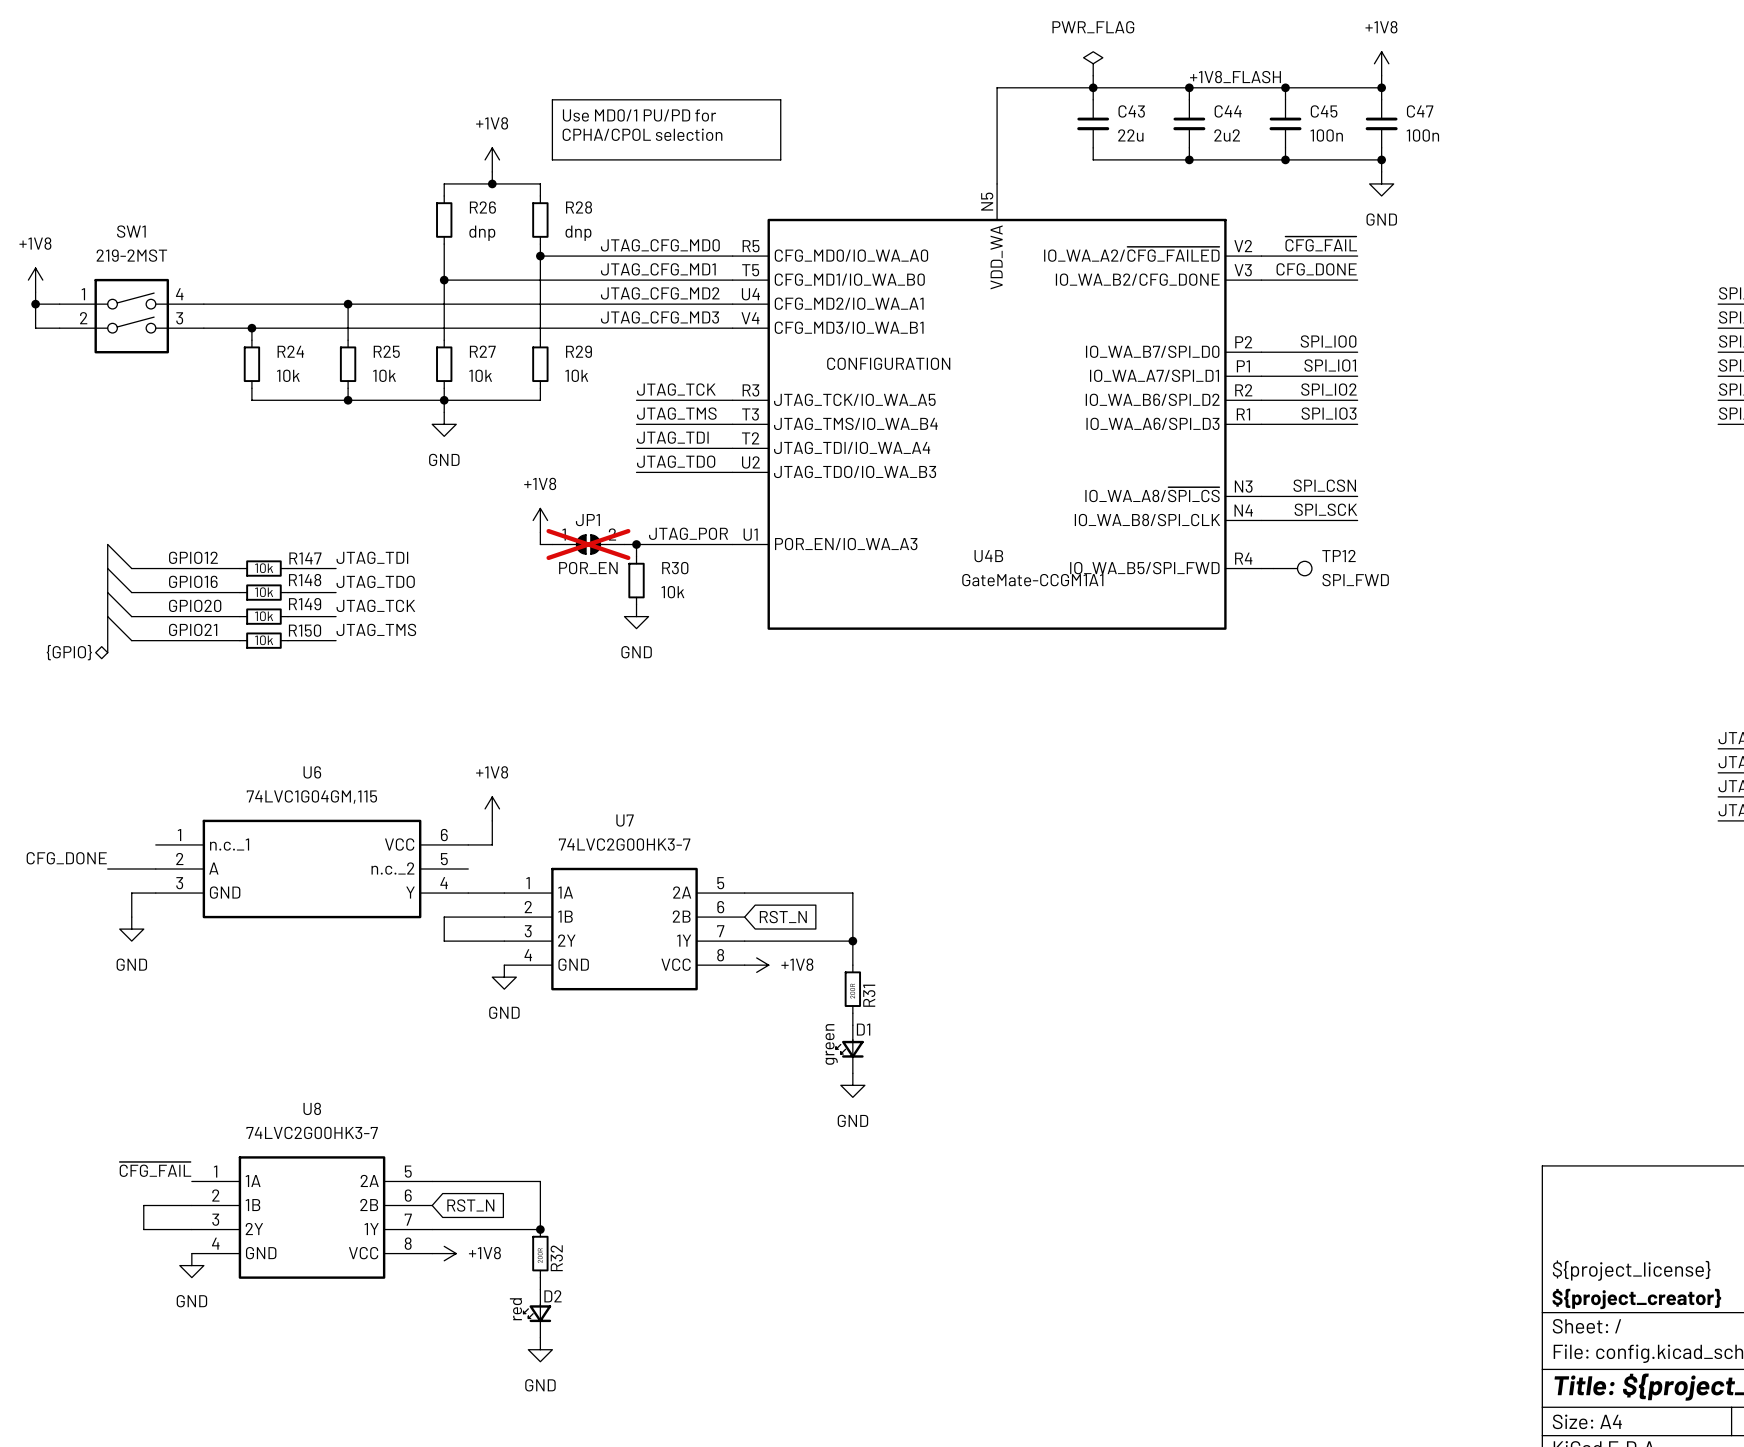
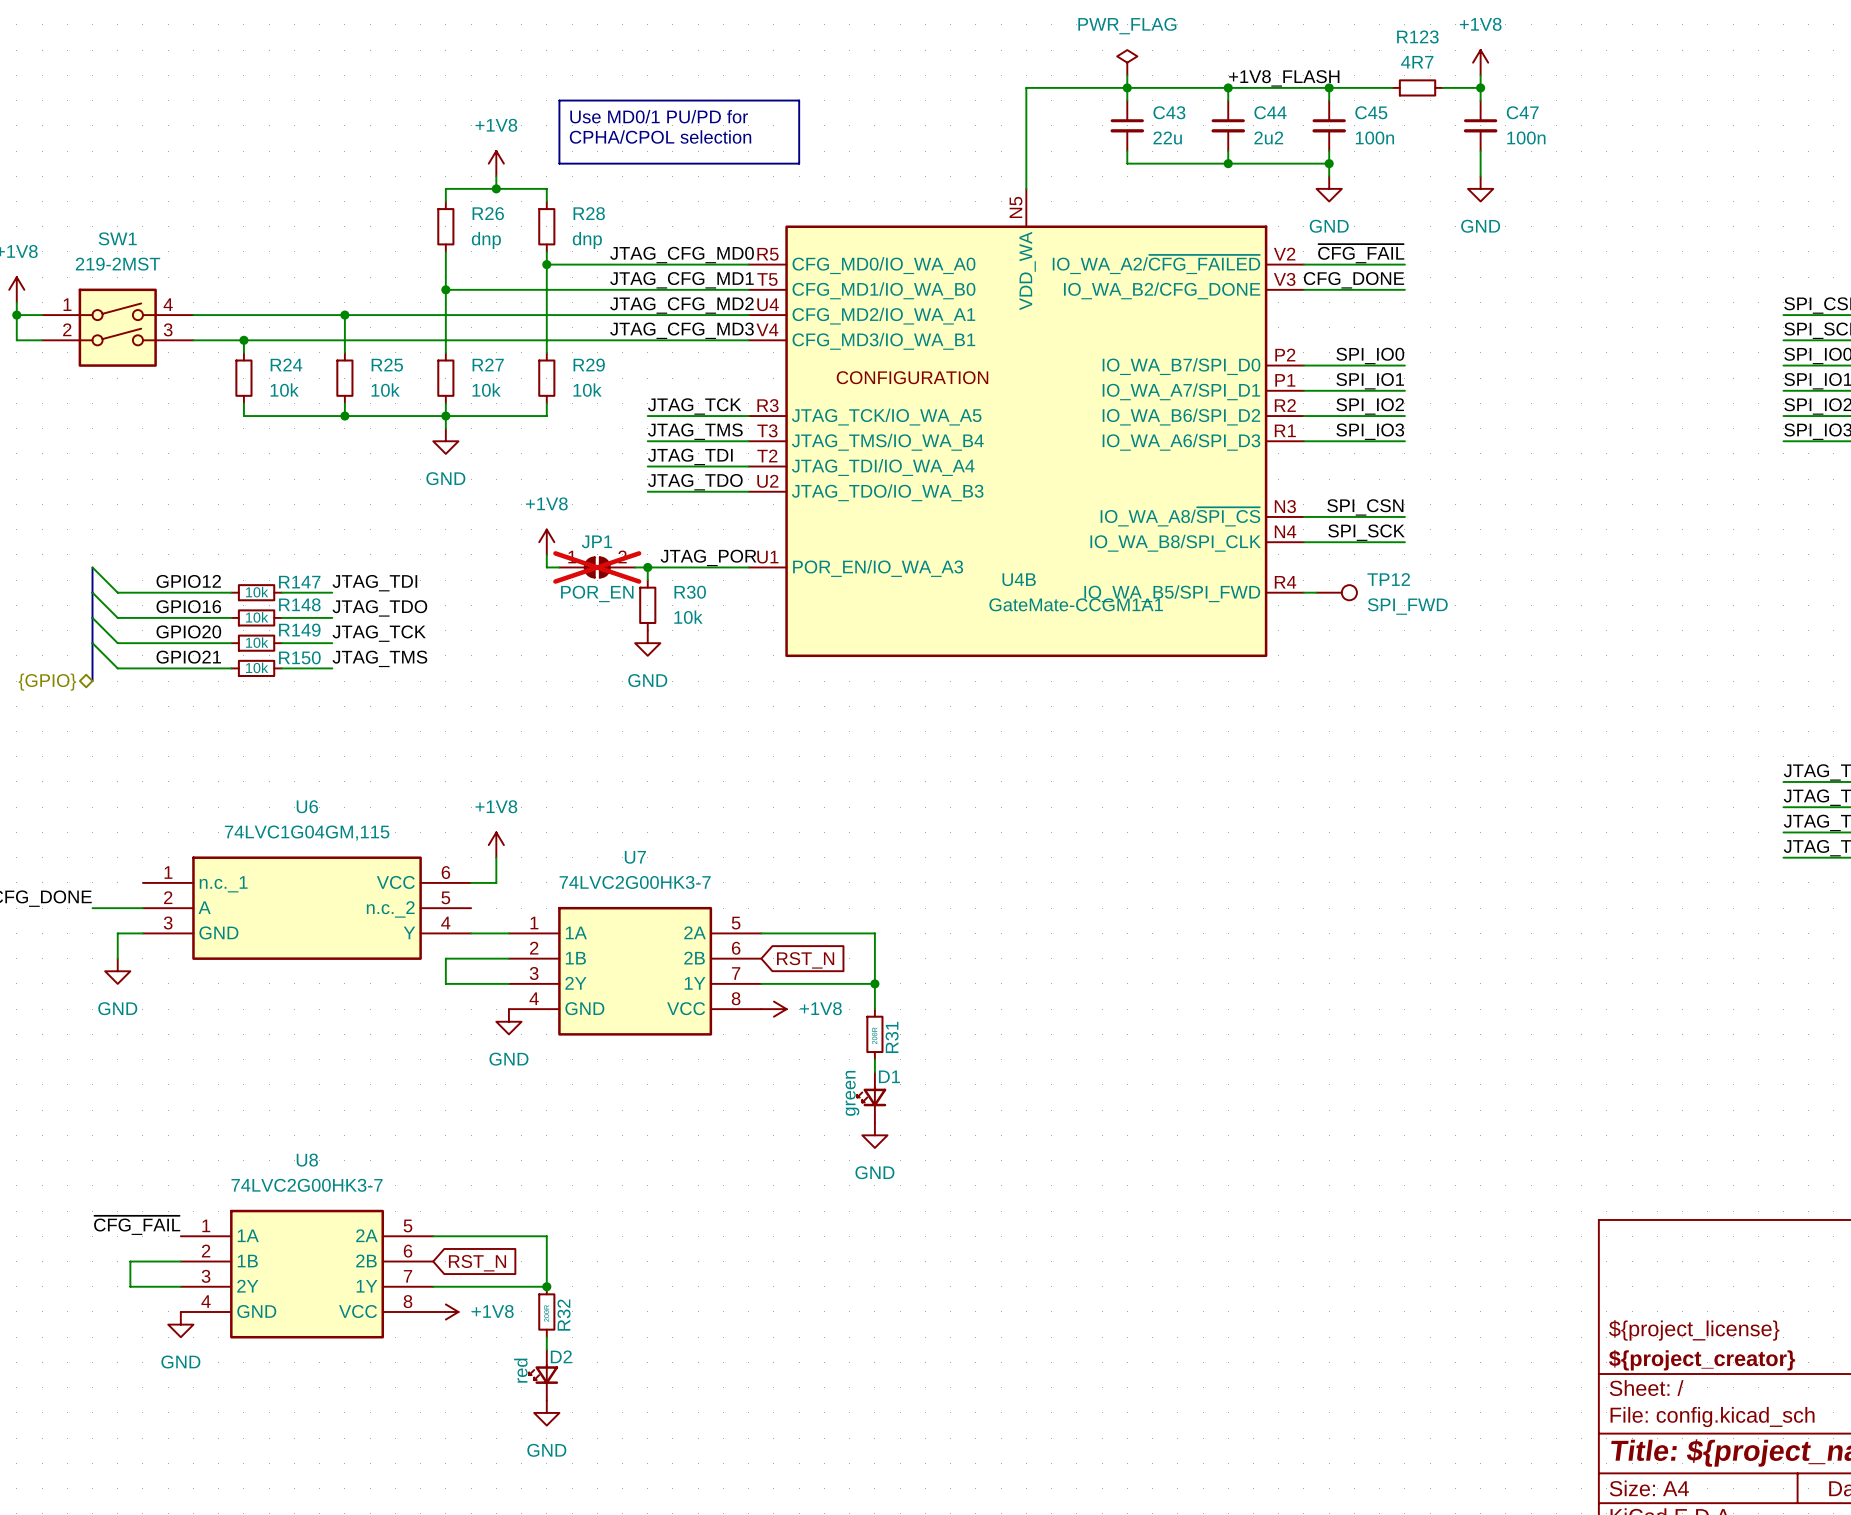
power symbol position: +1V8 (1381, 63) -> +1V8 (1480, 62)
wire: (1381, 75) (1381, 99) -> (1480, 75) (1480, 100)
wire: (1345, 87) (1381, 87) -> (1442, 87) (1480, 87)
R123: none -> 4R7 (1417, 87)
junction: (1381, 87) -> none
junction: none -> (1480, 87)
C47 position: (1381, 123) -> (1480, 125)
wire: (1381, 147) (1381, 171) -> (1480, 151) (1480, 176)
wire: (1285, 159) (1381, 159) -> (1329, 163) (1329, 176)
junction: (1381, 159) -> none
power symbol: none -> GND (1329, 188)
power symbol: GND (1381, 183) -> none
power symbol: none -> GND (1480, 188)

